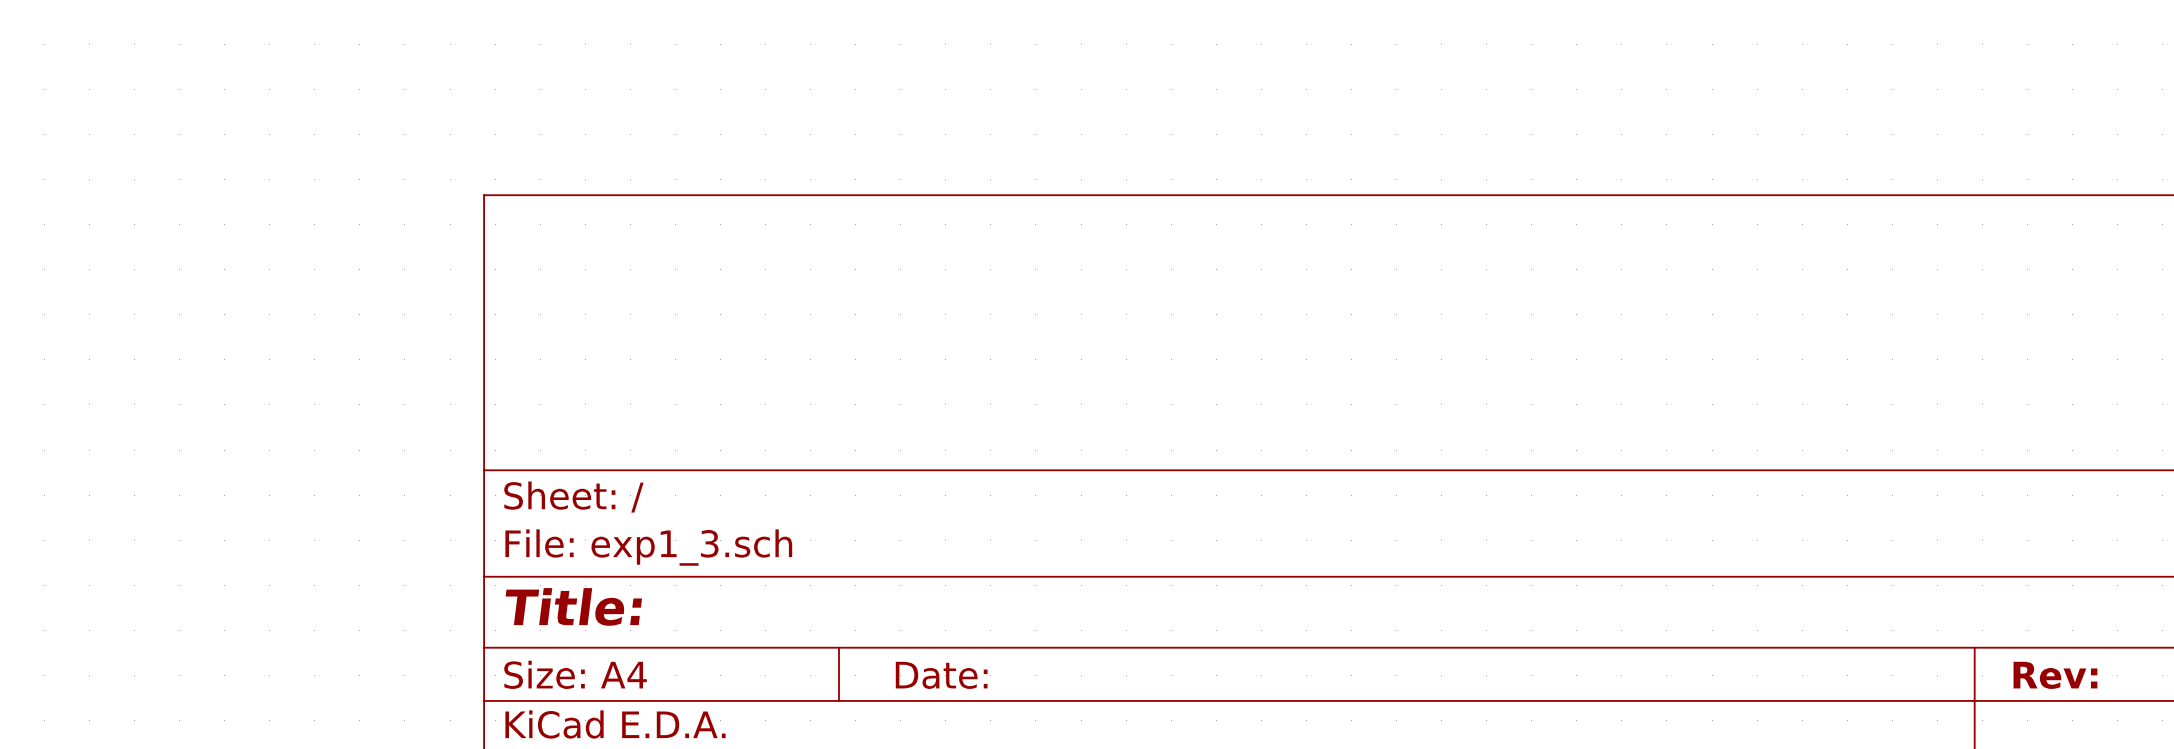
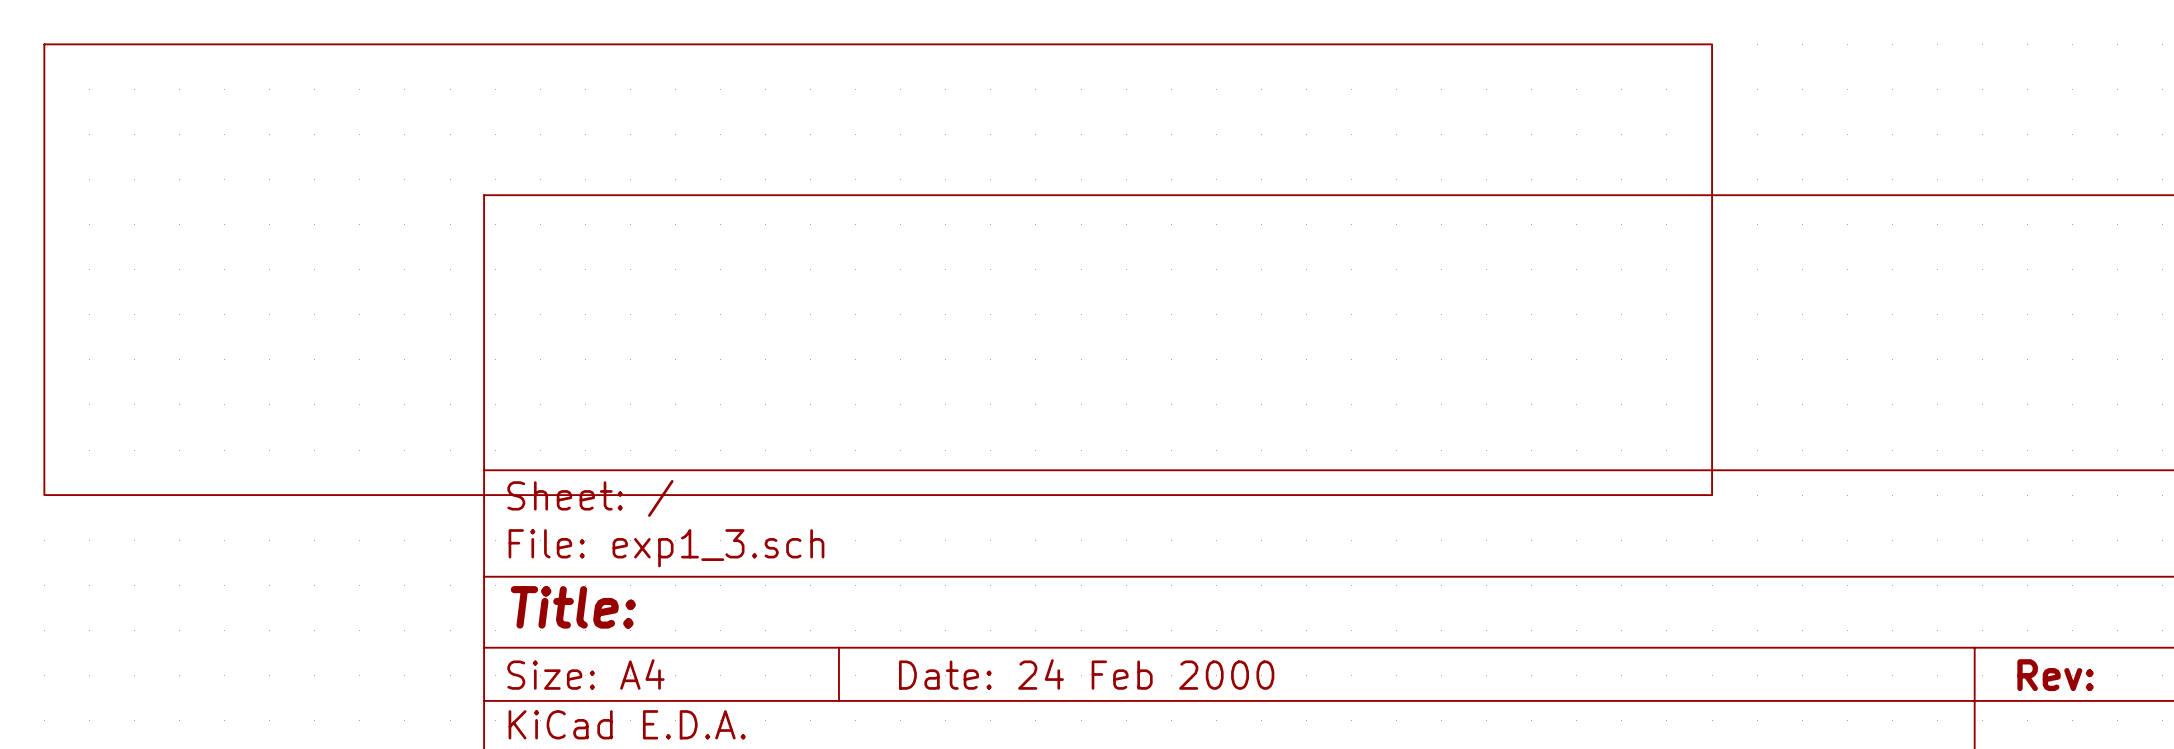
part: none -> (878, 269)
title block: Date: (941, 675) -> Date: 24 Feb 2000 (1086, 674)

